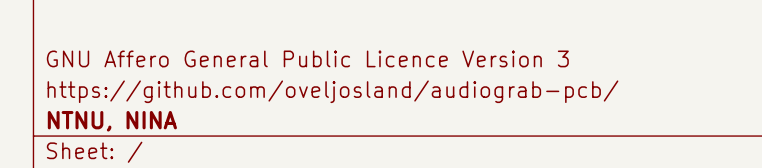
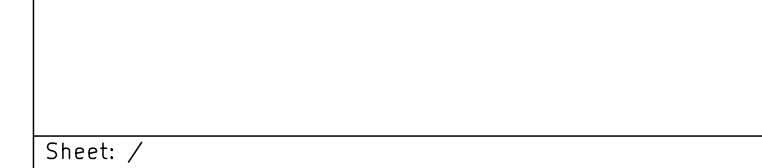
title block: GNU Affero General Public Licence Version 3 (307, 58) -> none
title block: https://github.com/oveljosland/audiograb-pcb/ (332, 91) -> none
title block: NTNU, NINA (112, 121) -> none

